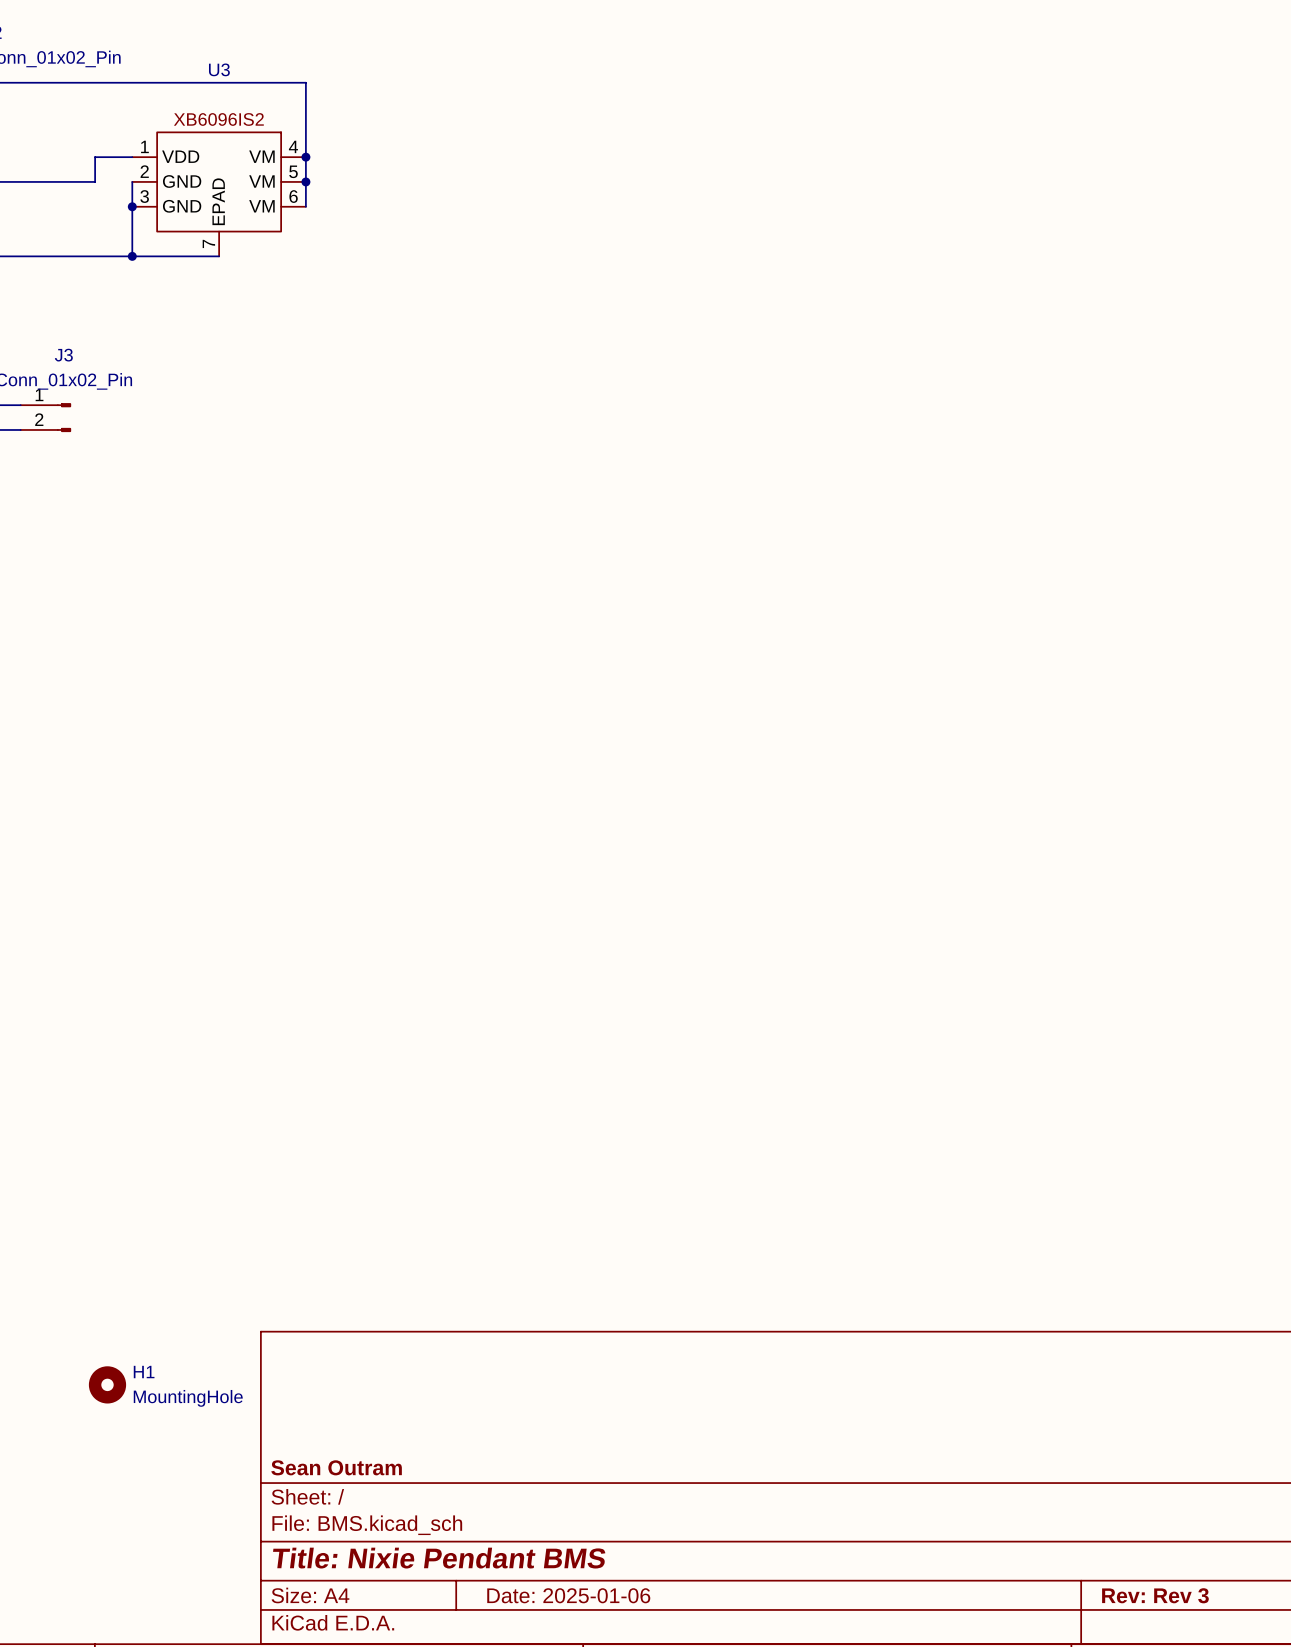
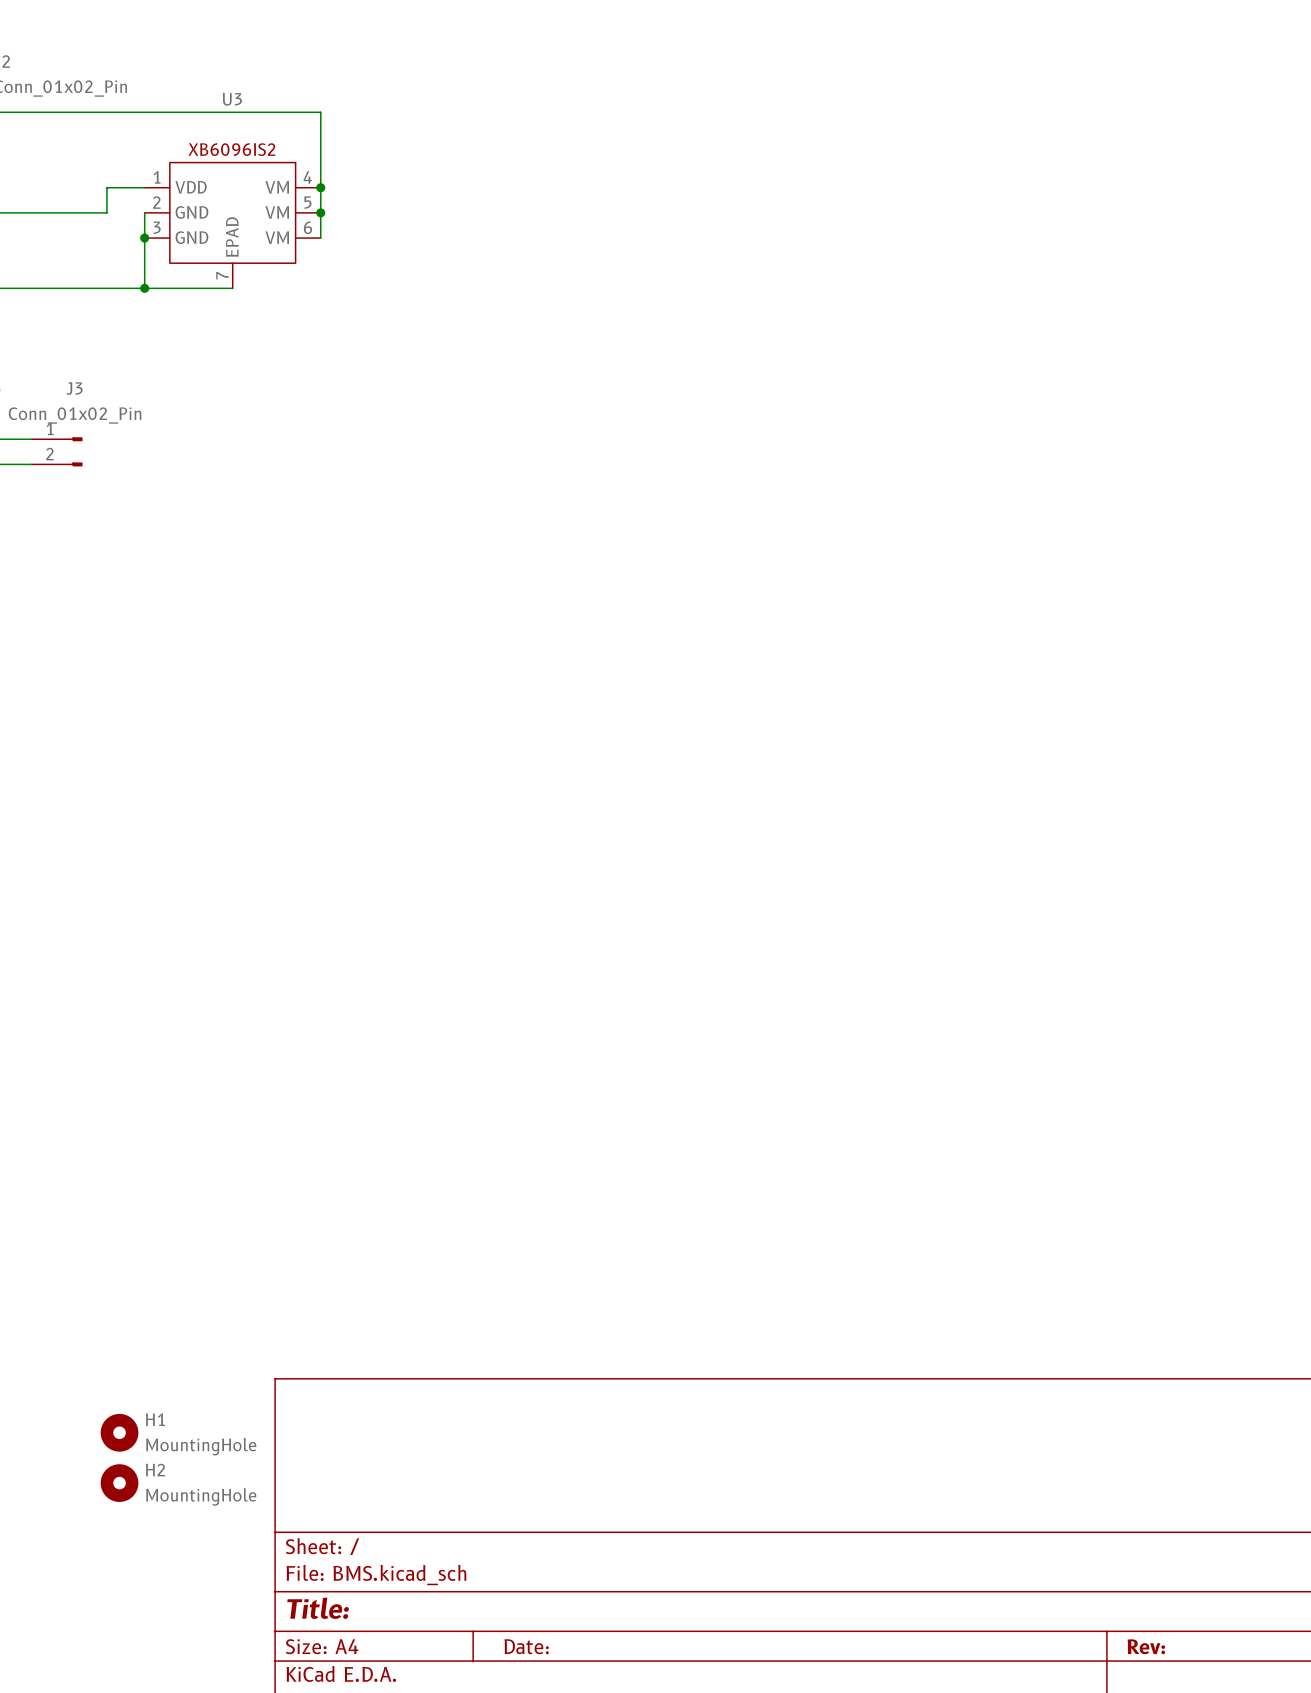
H2: none -> MountingHole (119, 1483)
title block: Sean Outram (336, 1467) -> none
title block: Title: Nixie Pendant BMS (439, 1558) -> Title: (318, 1608)
title block: Date: 2025-01-06 (568, 1595) -> Date: (526, 1646)
title block: Rev: Rev 3 (1155, 1595) -> Rev: (1146, 1646)

